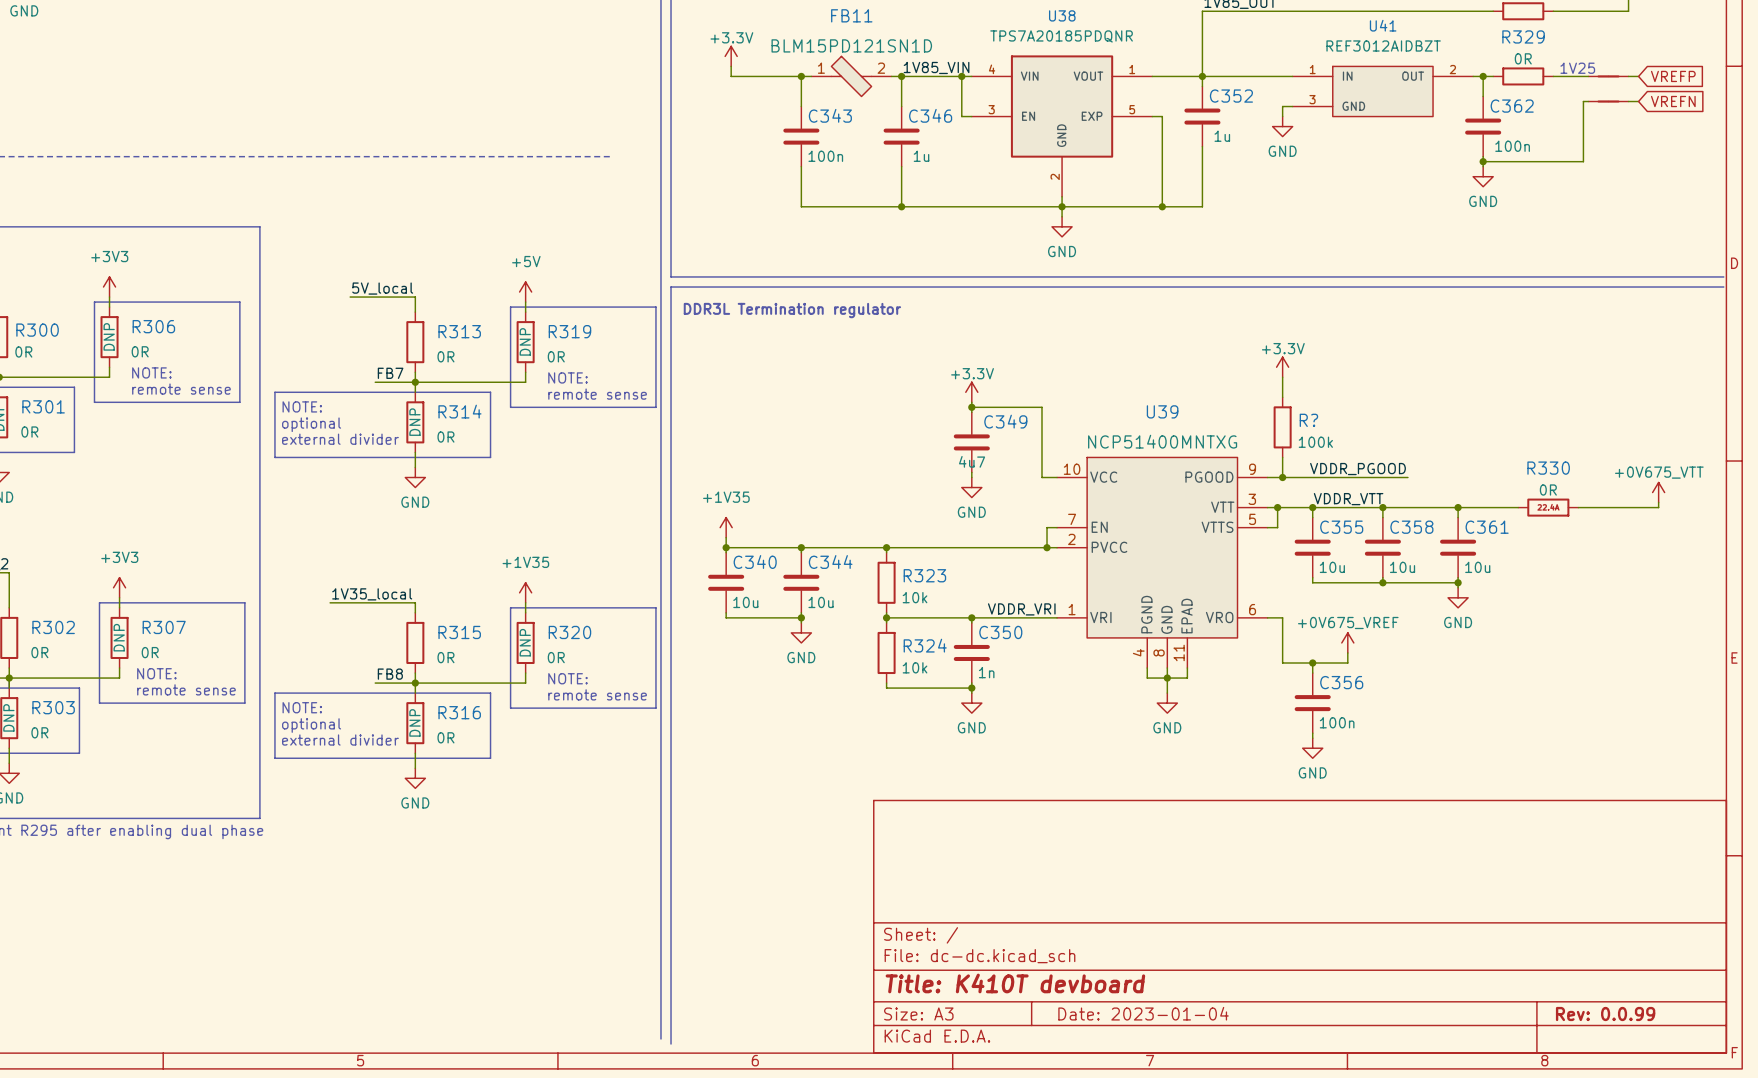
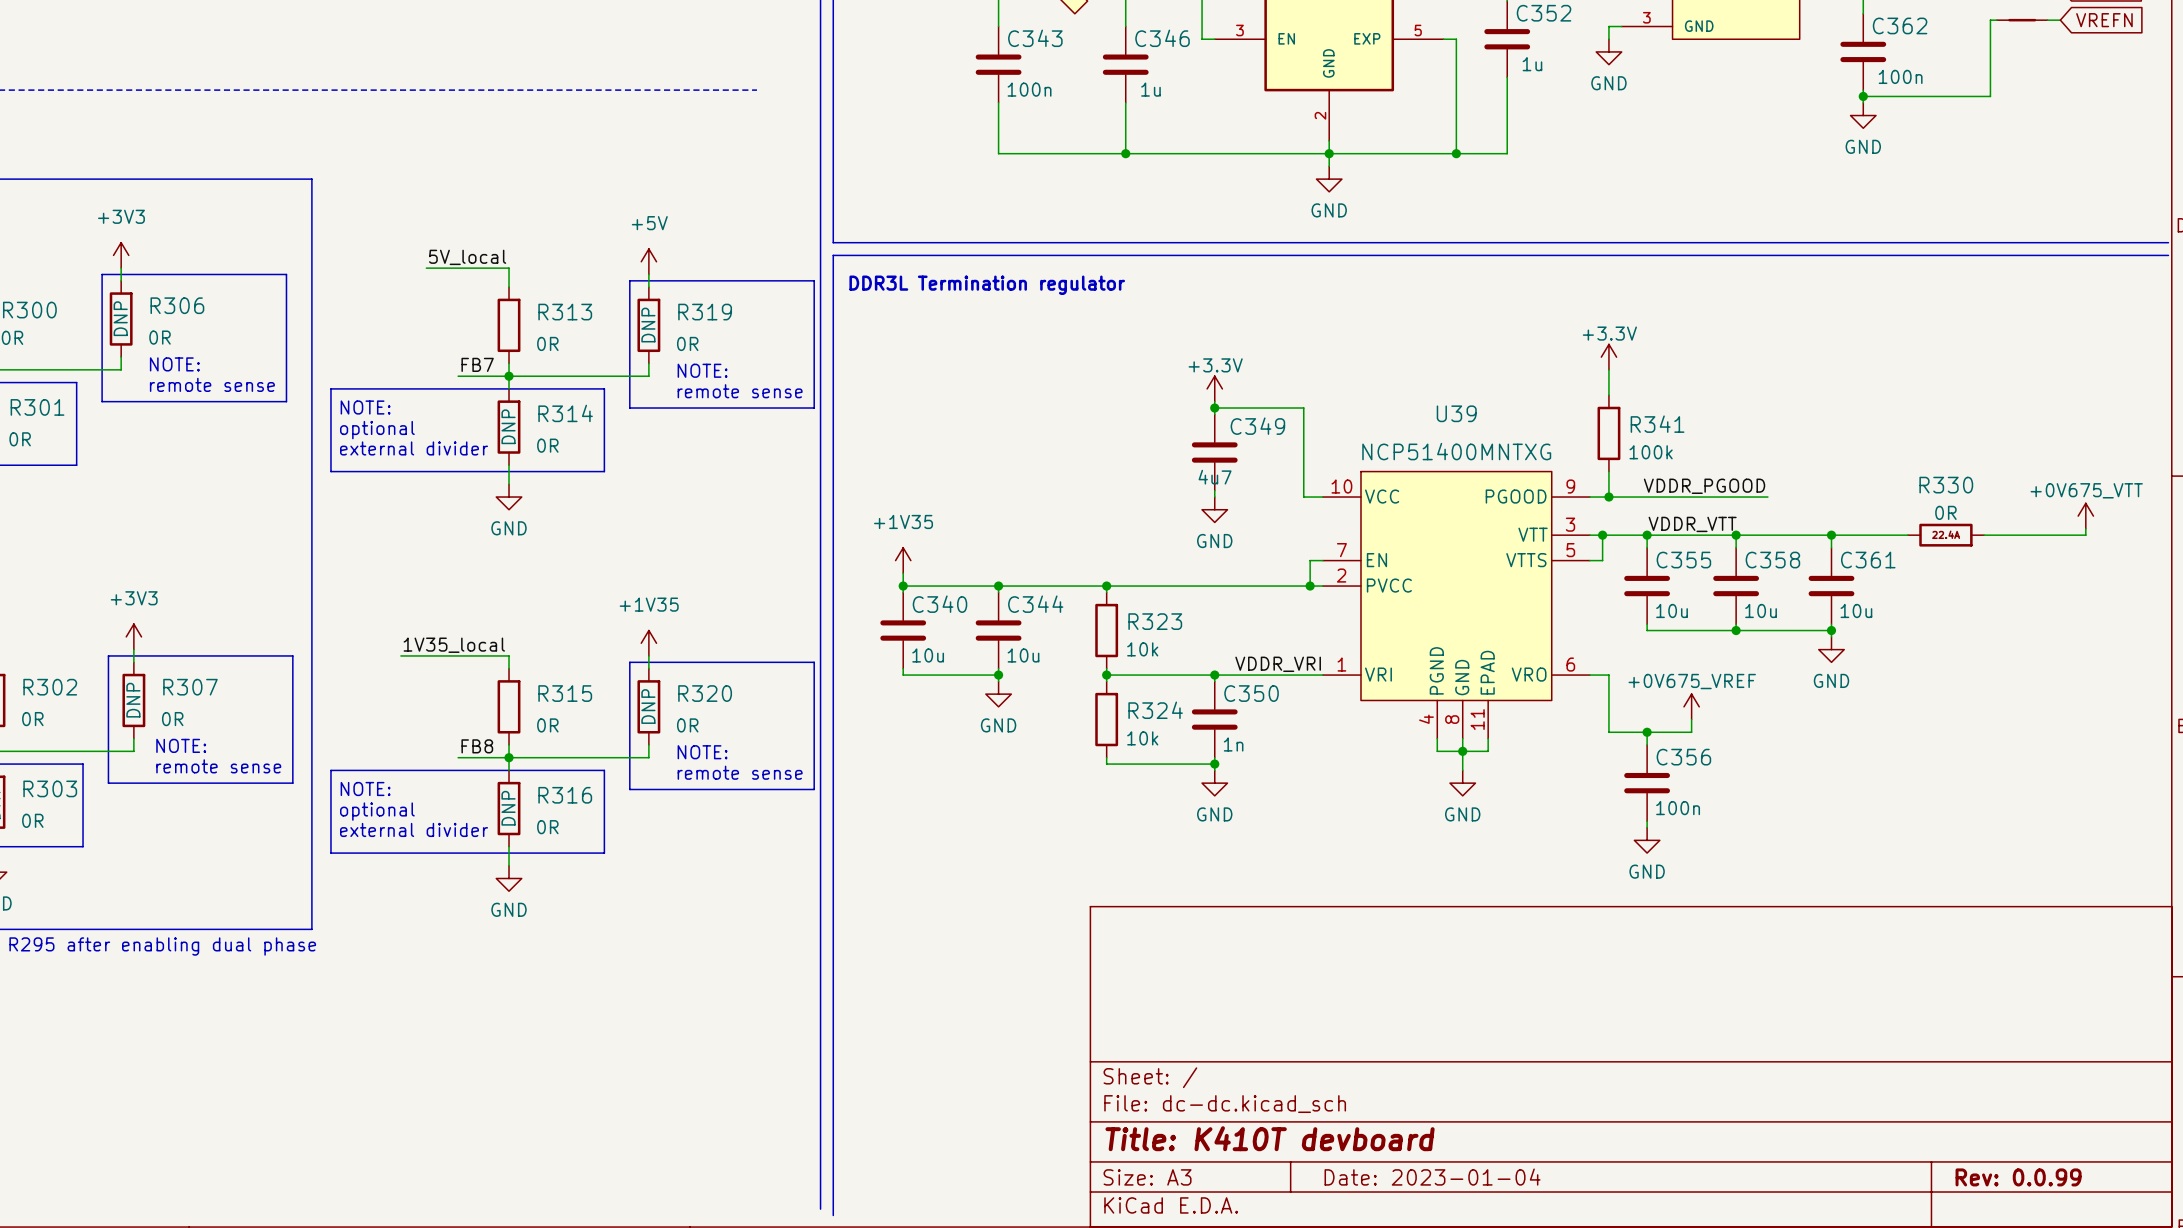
R? name: R? (1308, 420) -> R341 (1657, 424)

